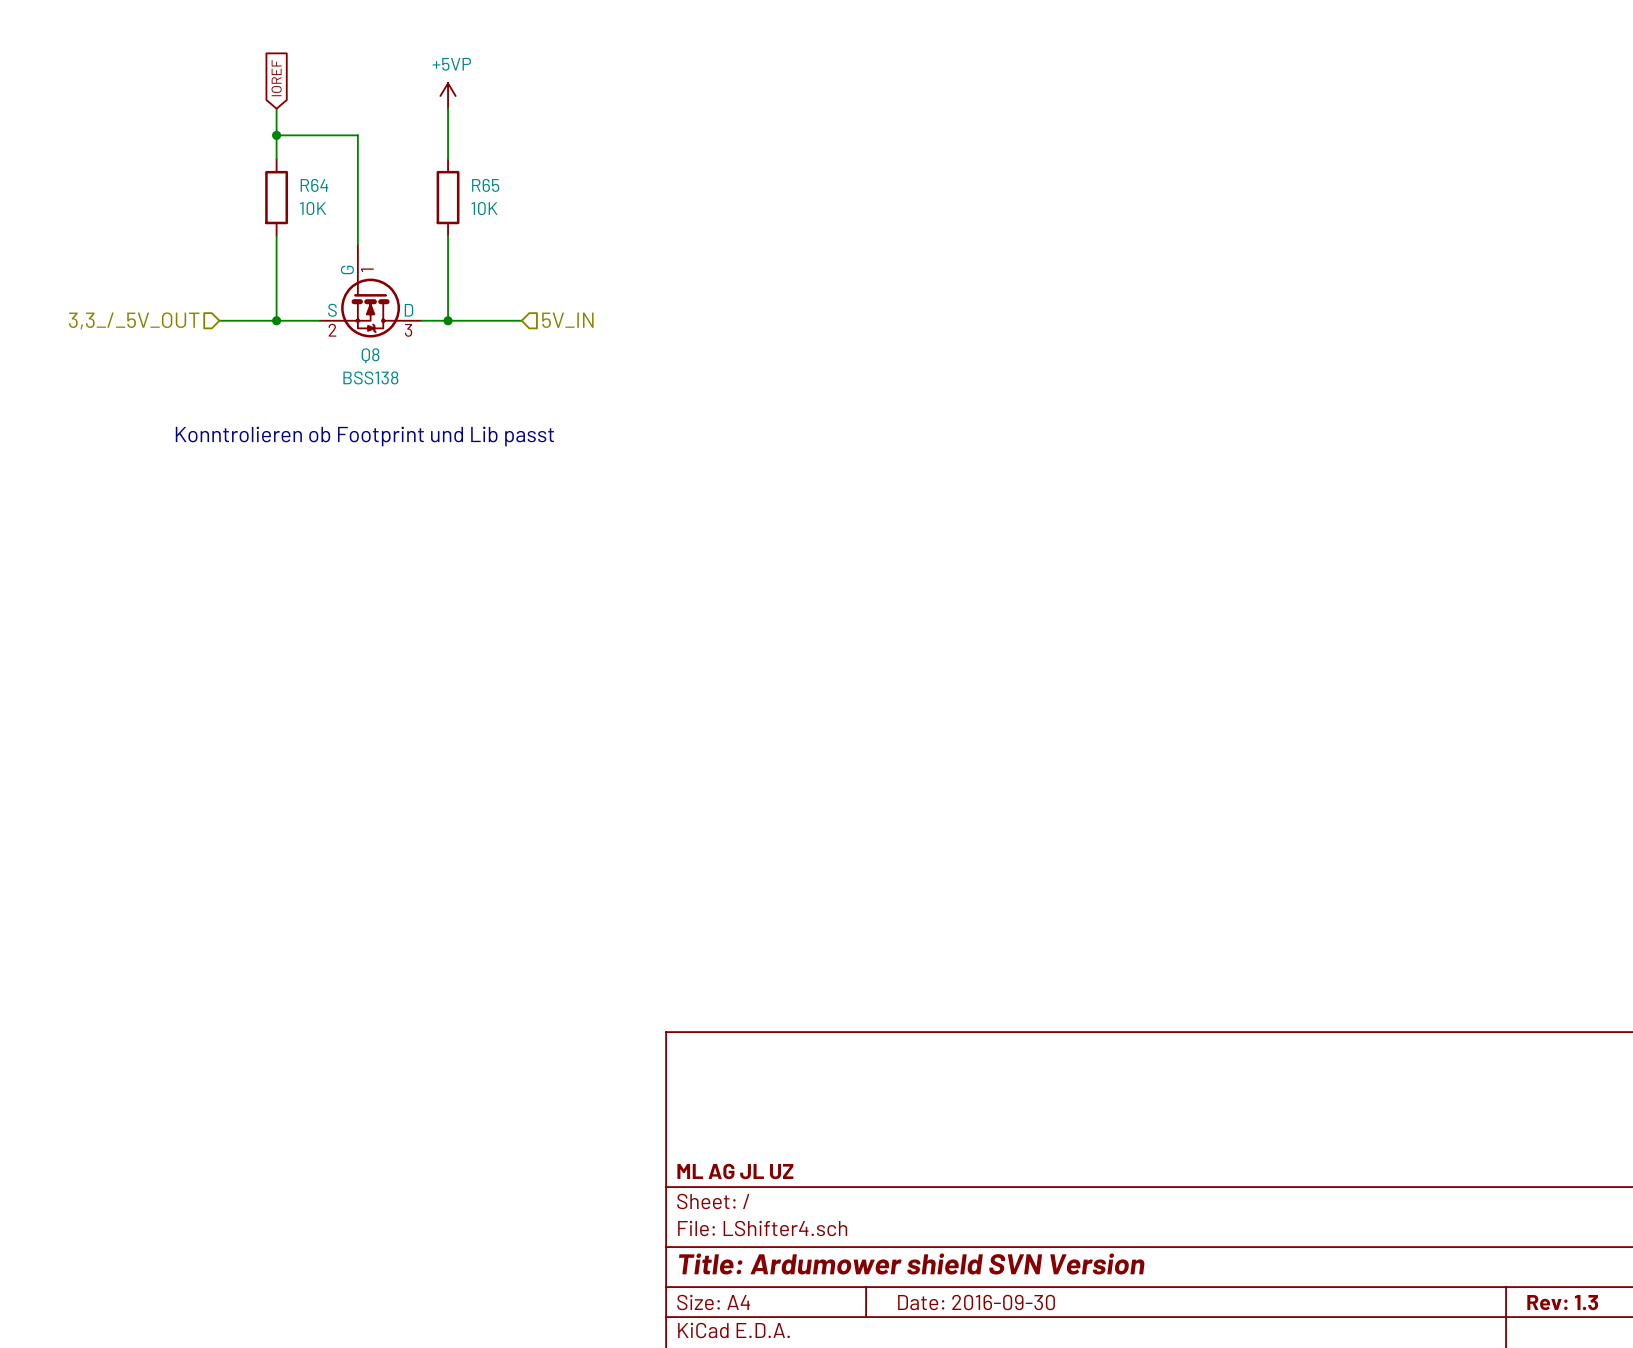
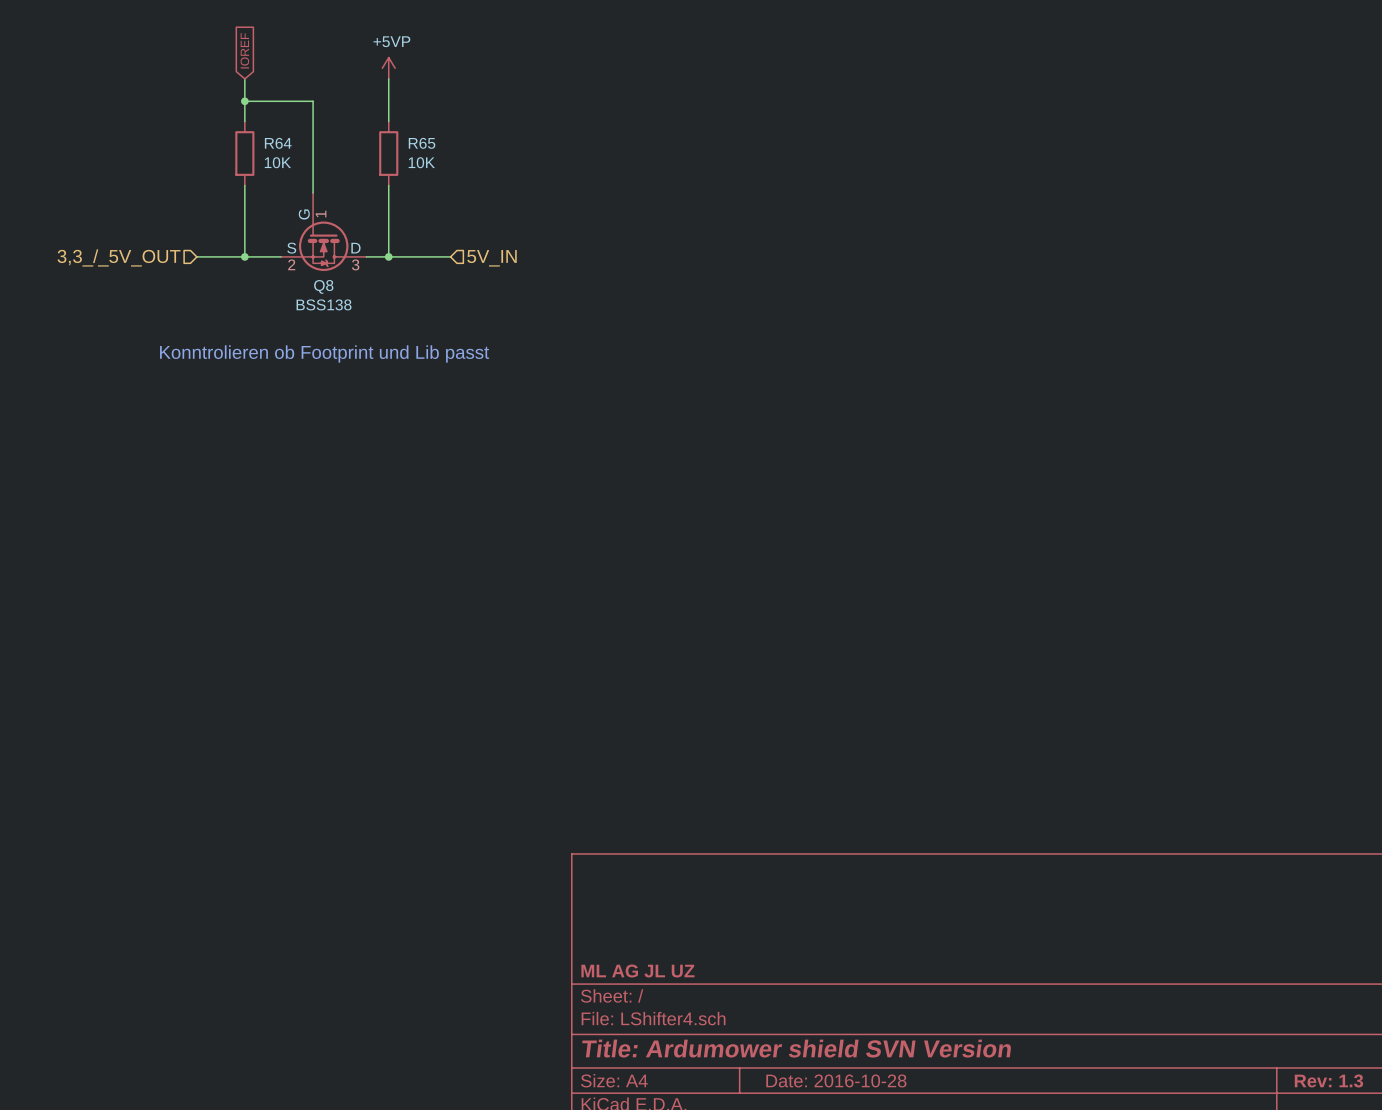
title block: Date: 2016-09-30 (976, 1302) -> Date: 2016-10-28 (836, 1080)

